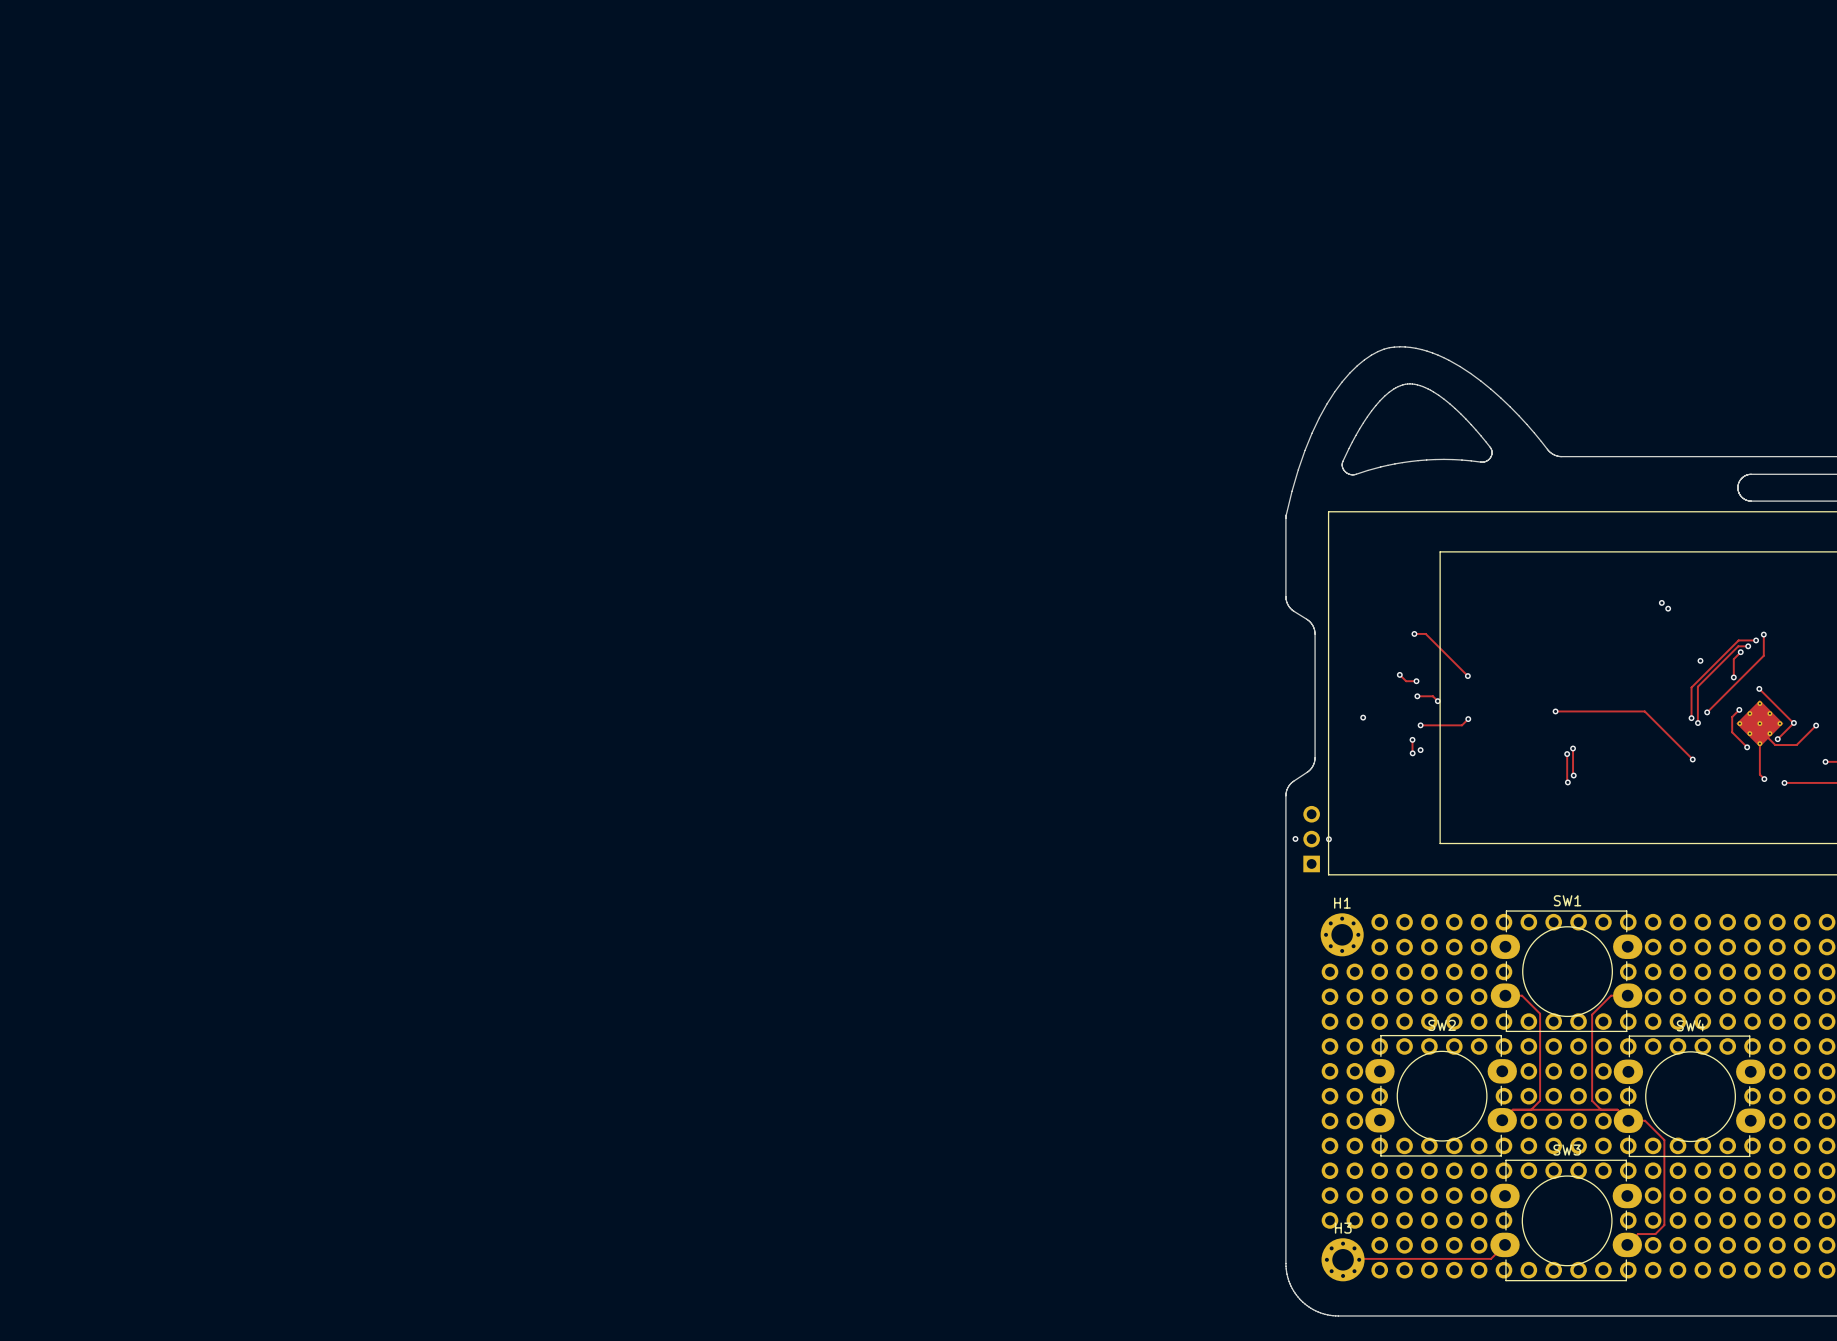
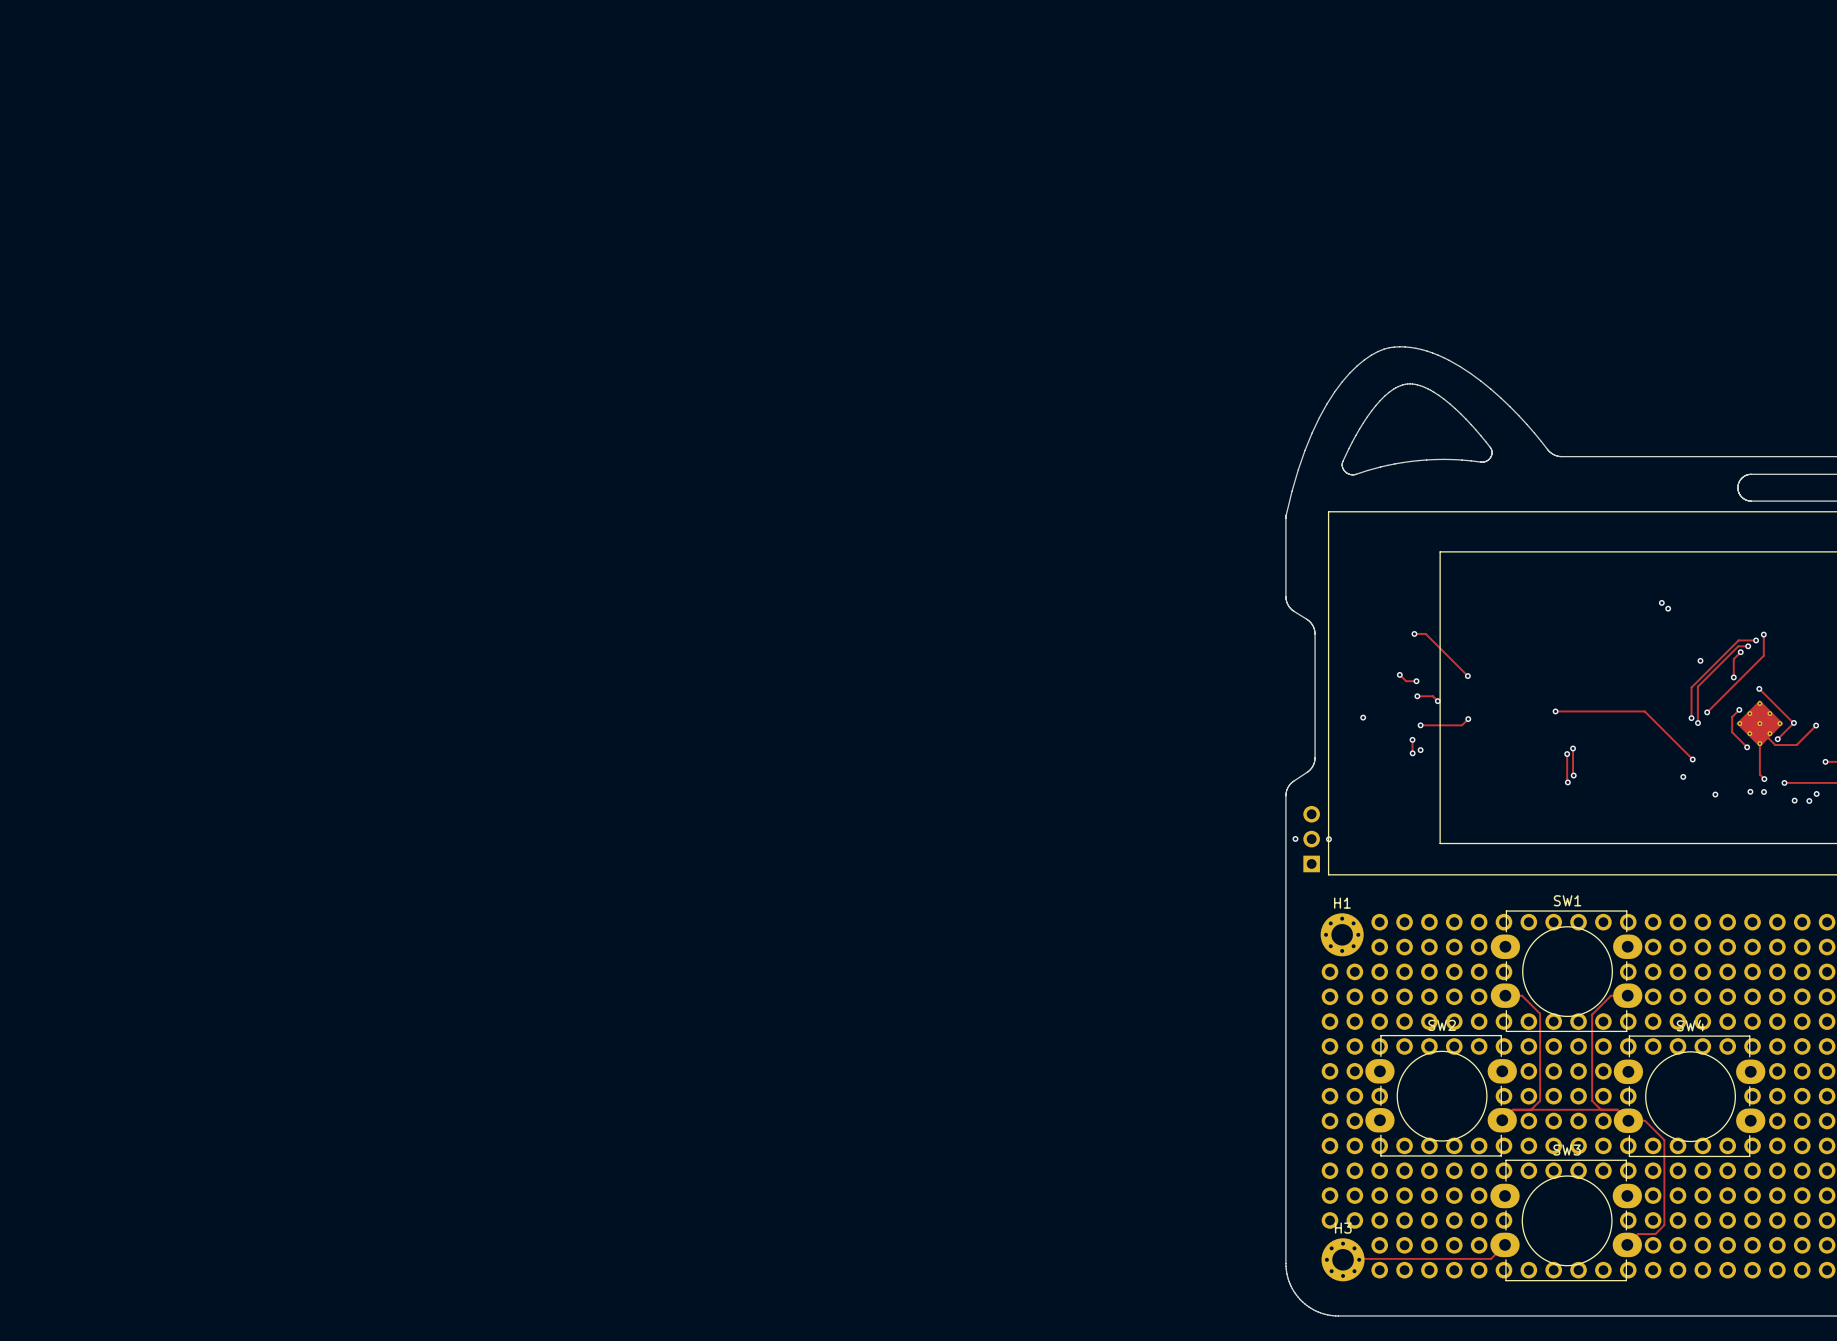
via: none -> (1683, 776)
via: none -> (1750, 791)
via: none -> (1764, 791)
via: none -> (1816, 793)
via: none -> (1715, 794)
via: none -> (1794, 800)
via: none -> (1809, 800)

